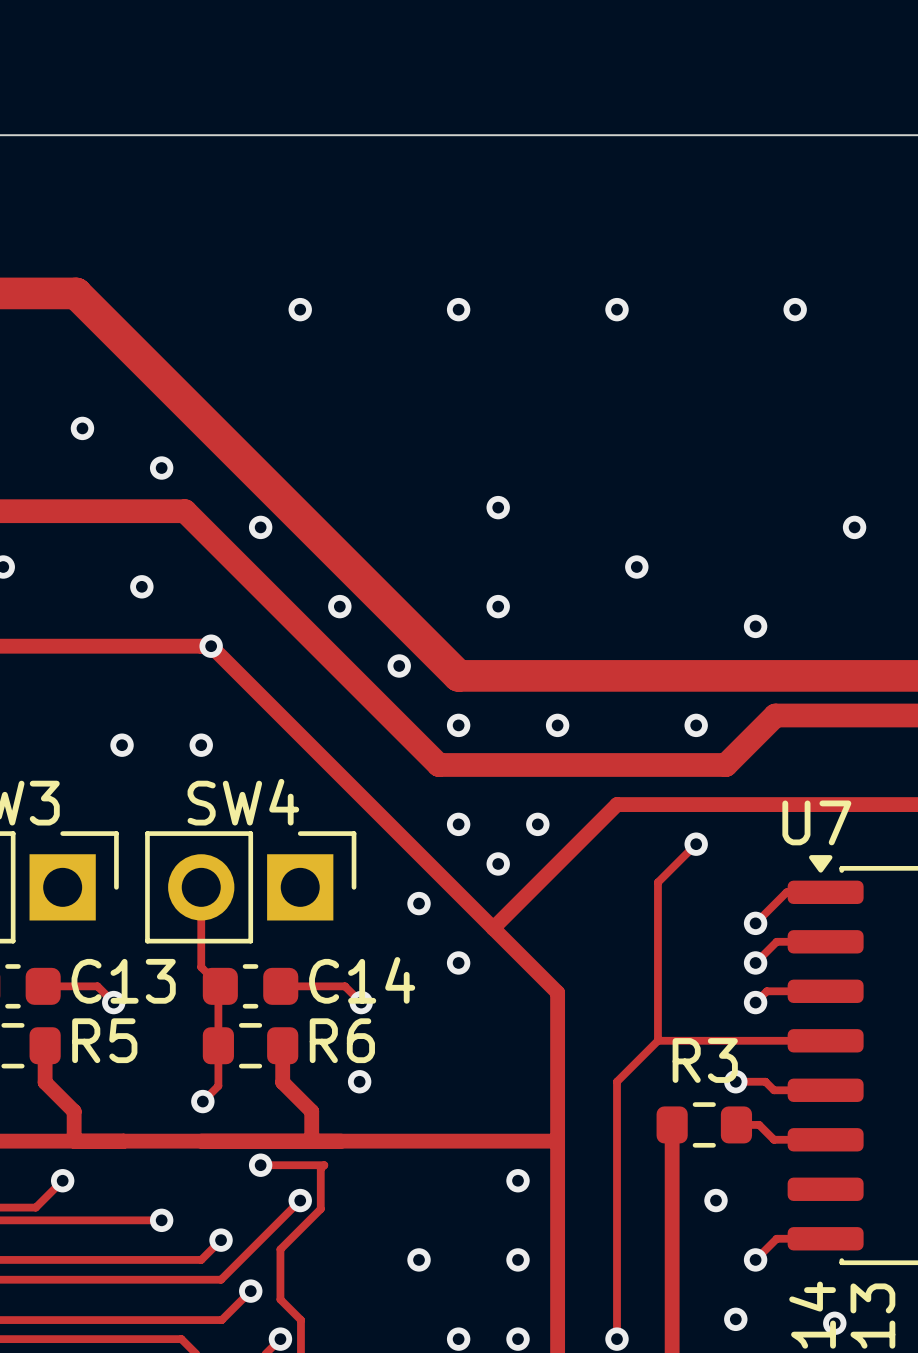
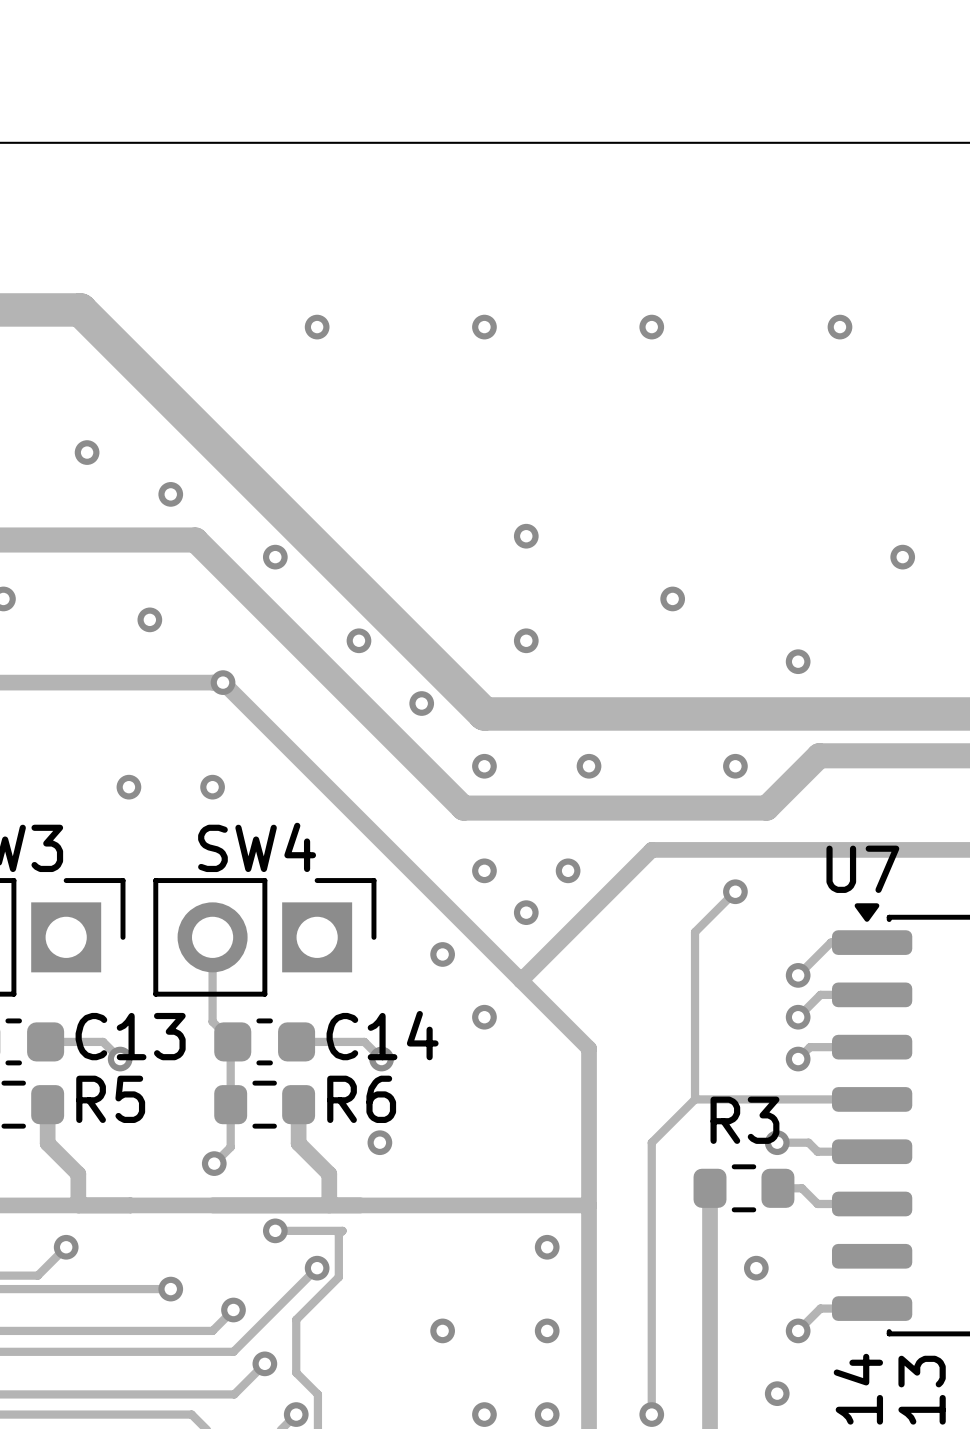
via: (834, 1323) -> none

